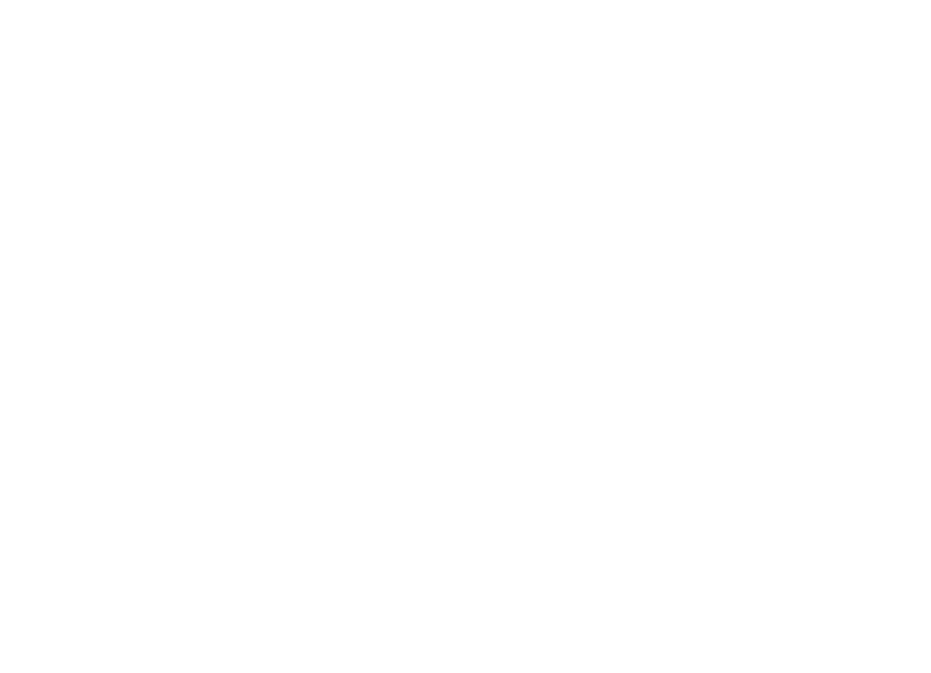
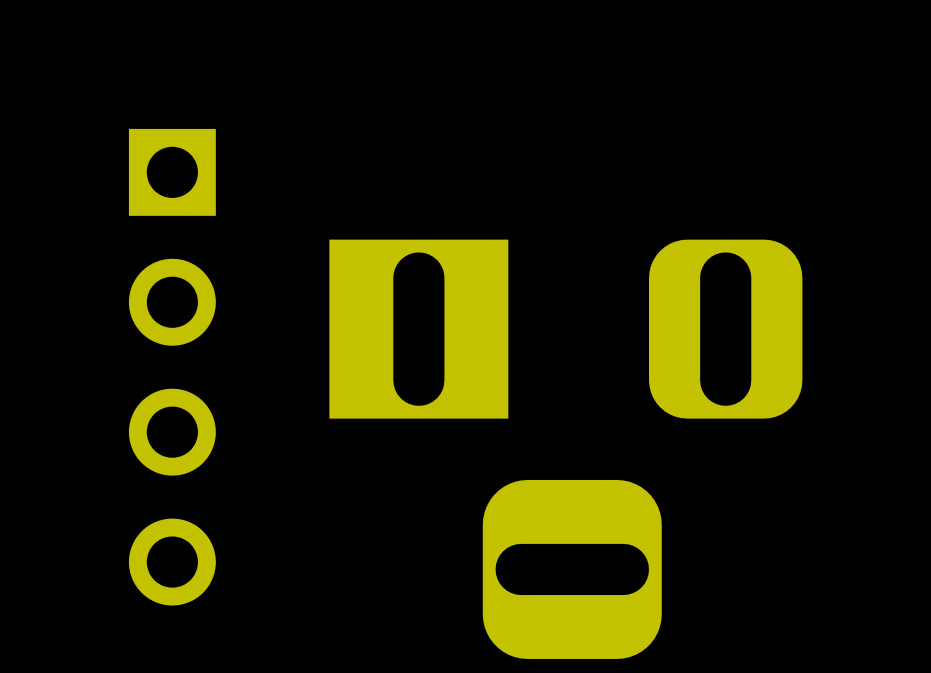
part: none -> (172, 367)
part: none -> (565, 449)

